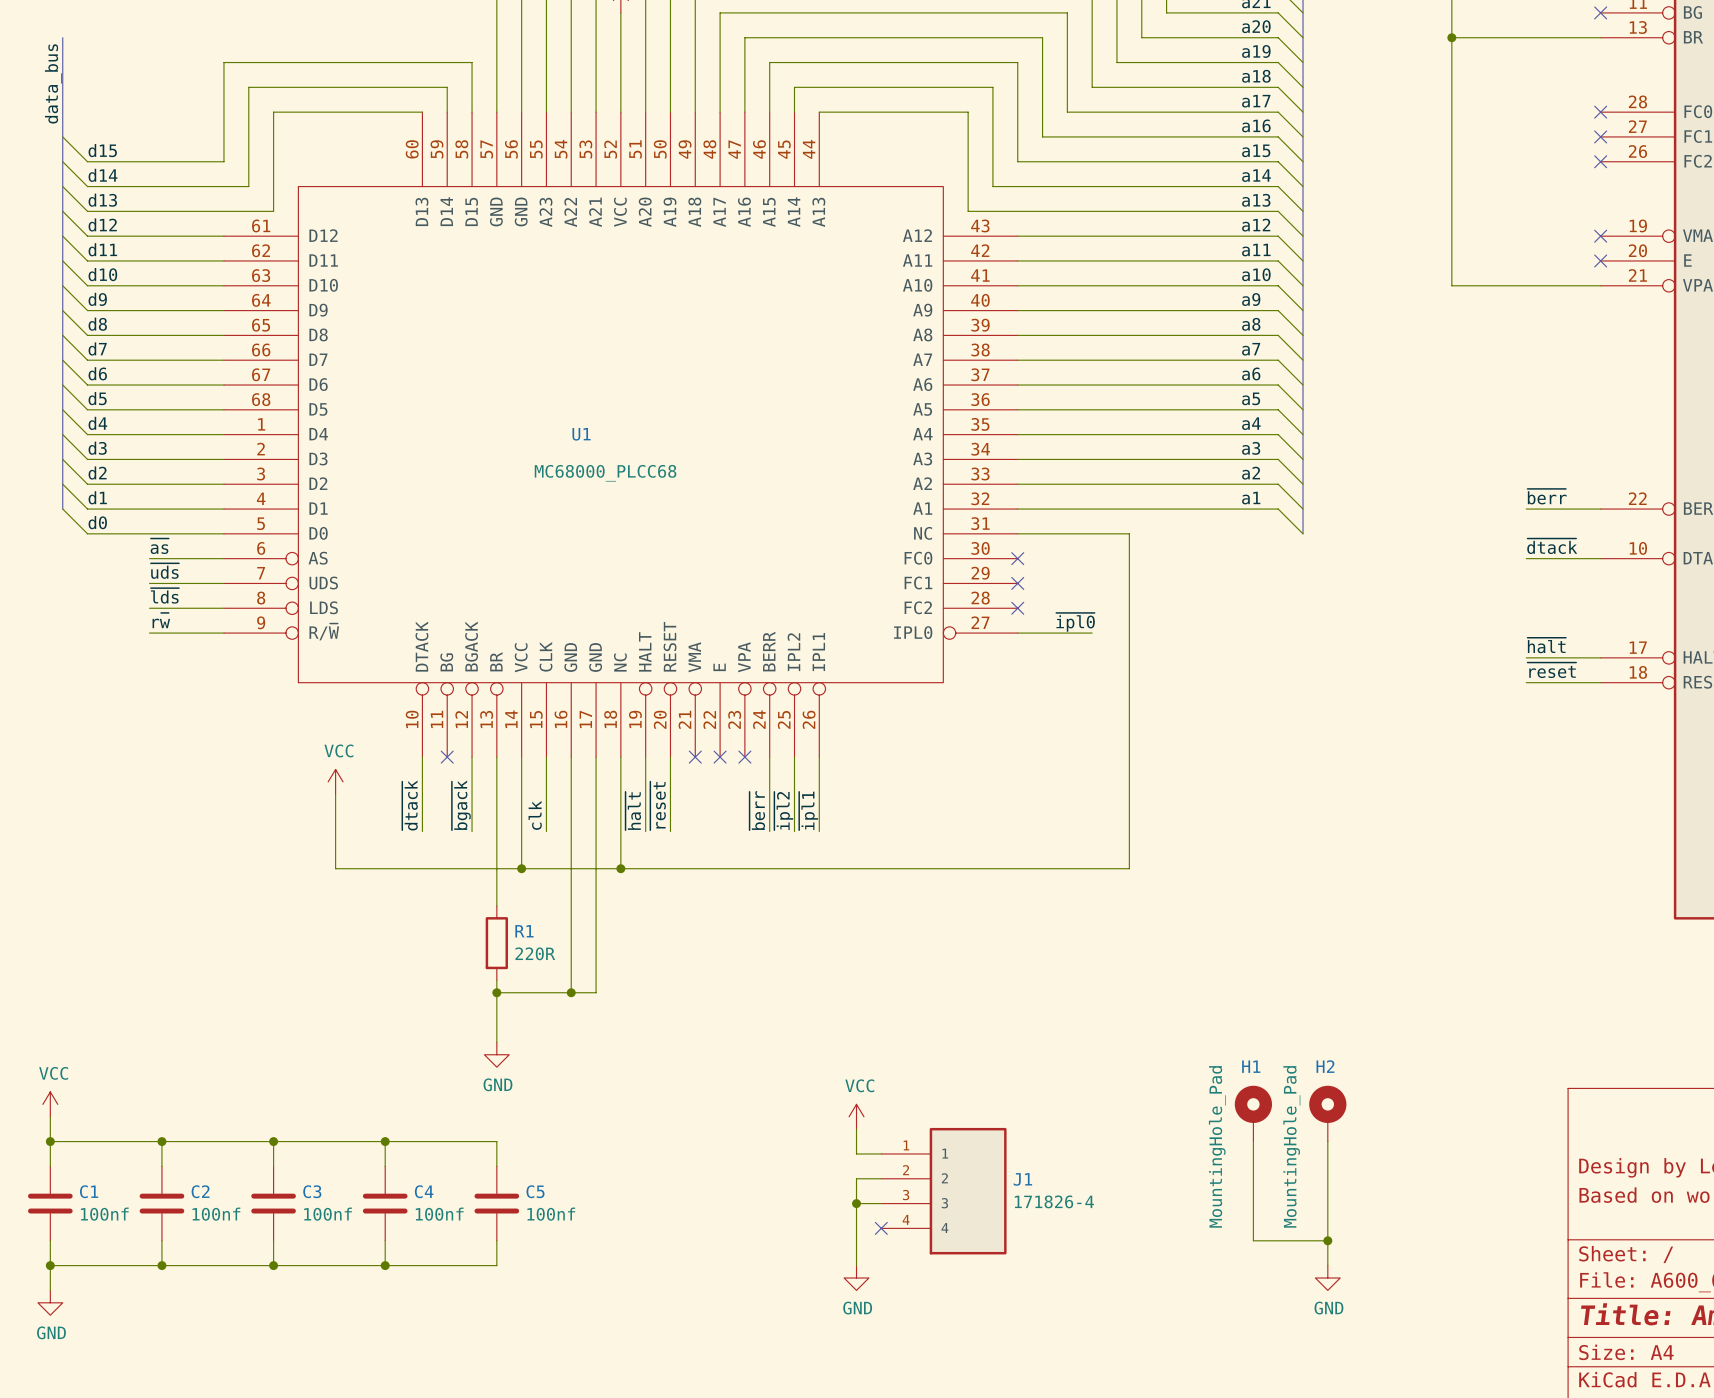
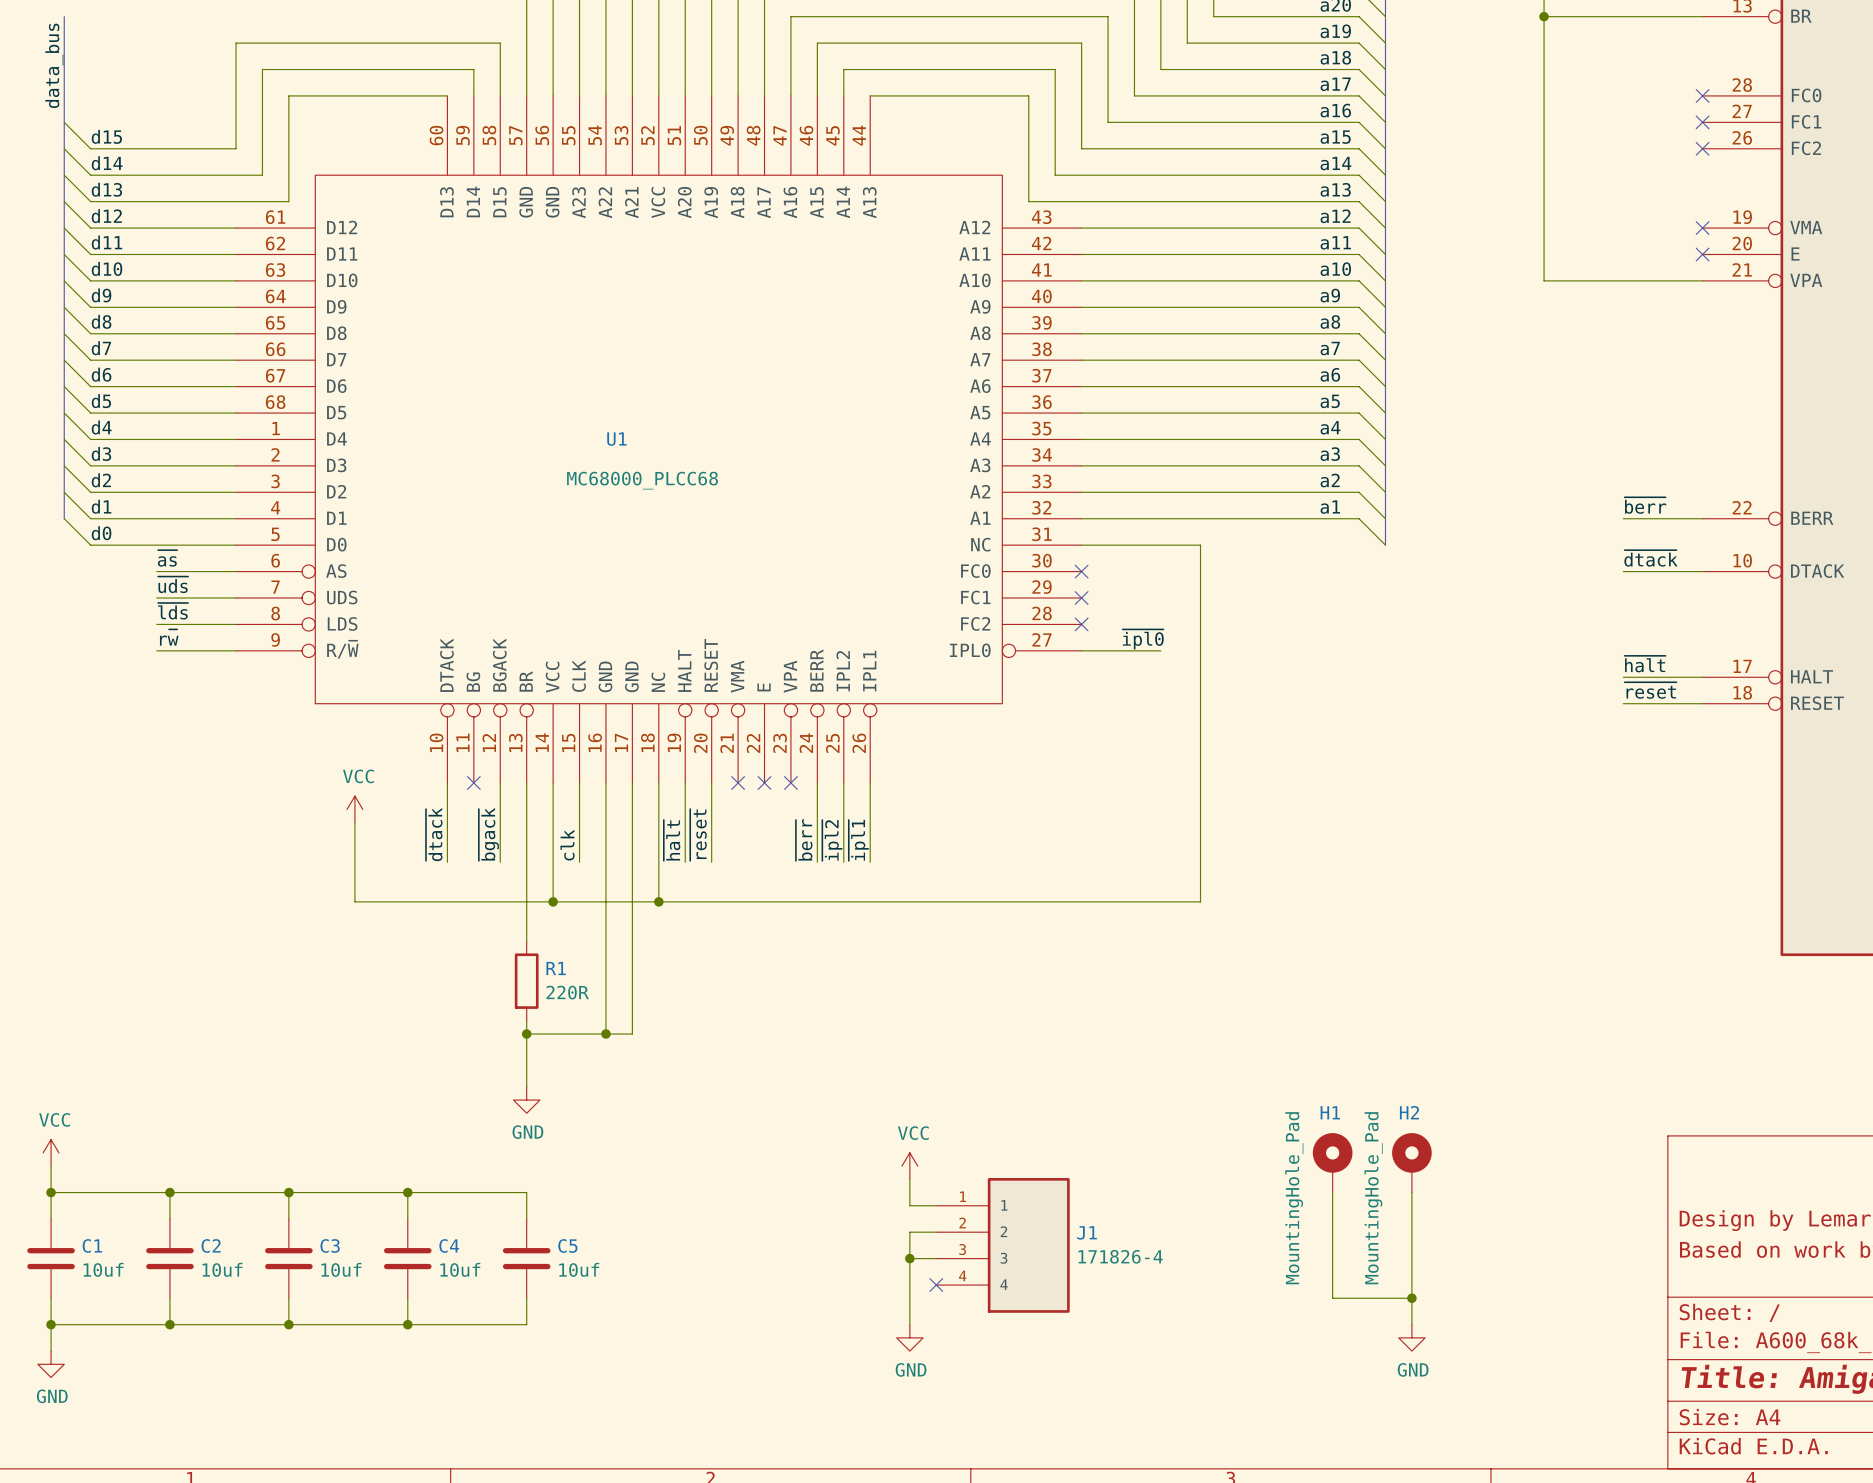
C1 value: 100nf (104, 1214) -> 10uf (103, 1269)
C2 value: 100nf (216, 1214) -> 10uf (222, 1269)
C3 value: 100nf (328, 1214) -> 10uf (341, 1269)
C4 value: 100nf (439, 1214) -> 10uf (460, 1269)
C5 value: 100nf (551, 1214) -> 10uf (579, 1269)

